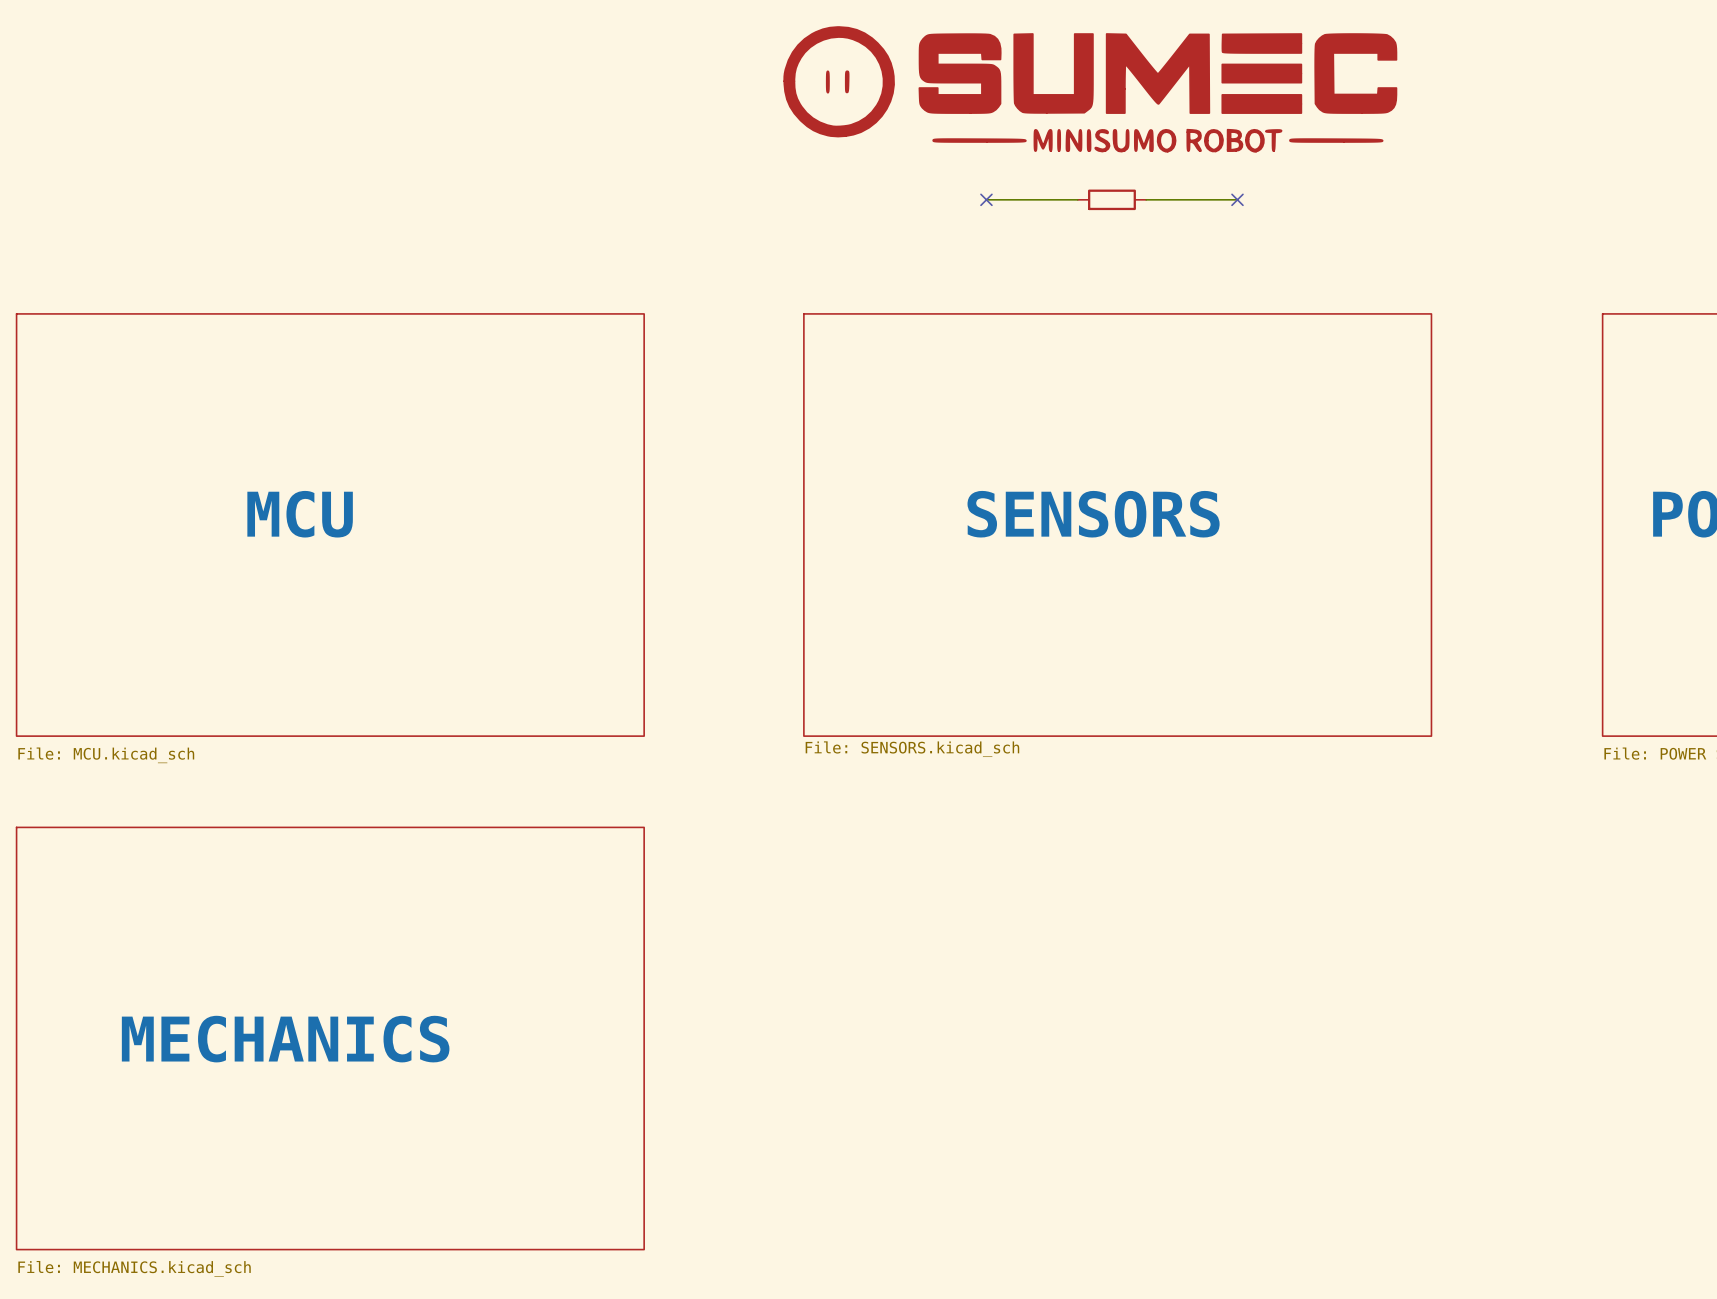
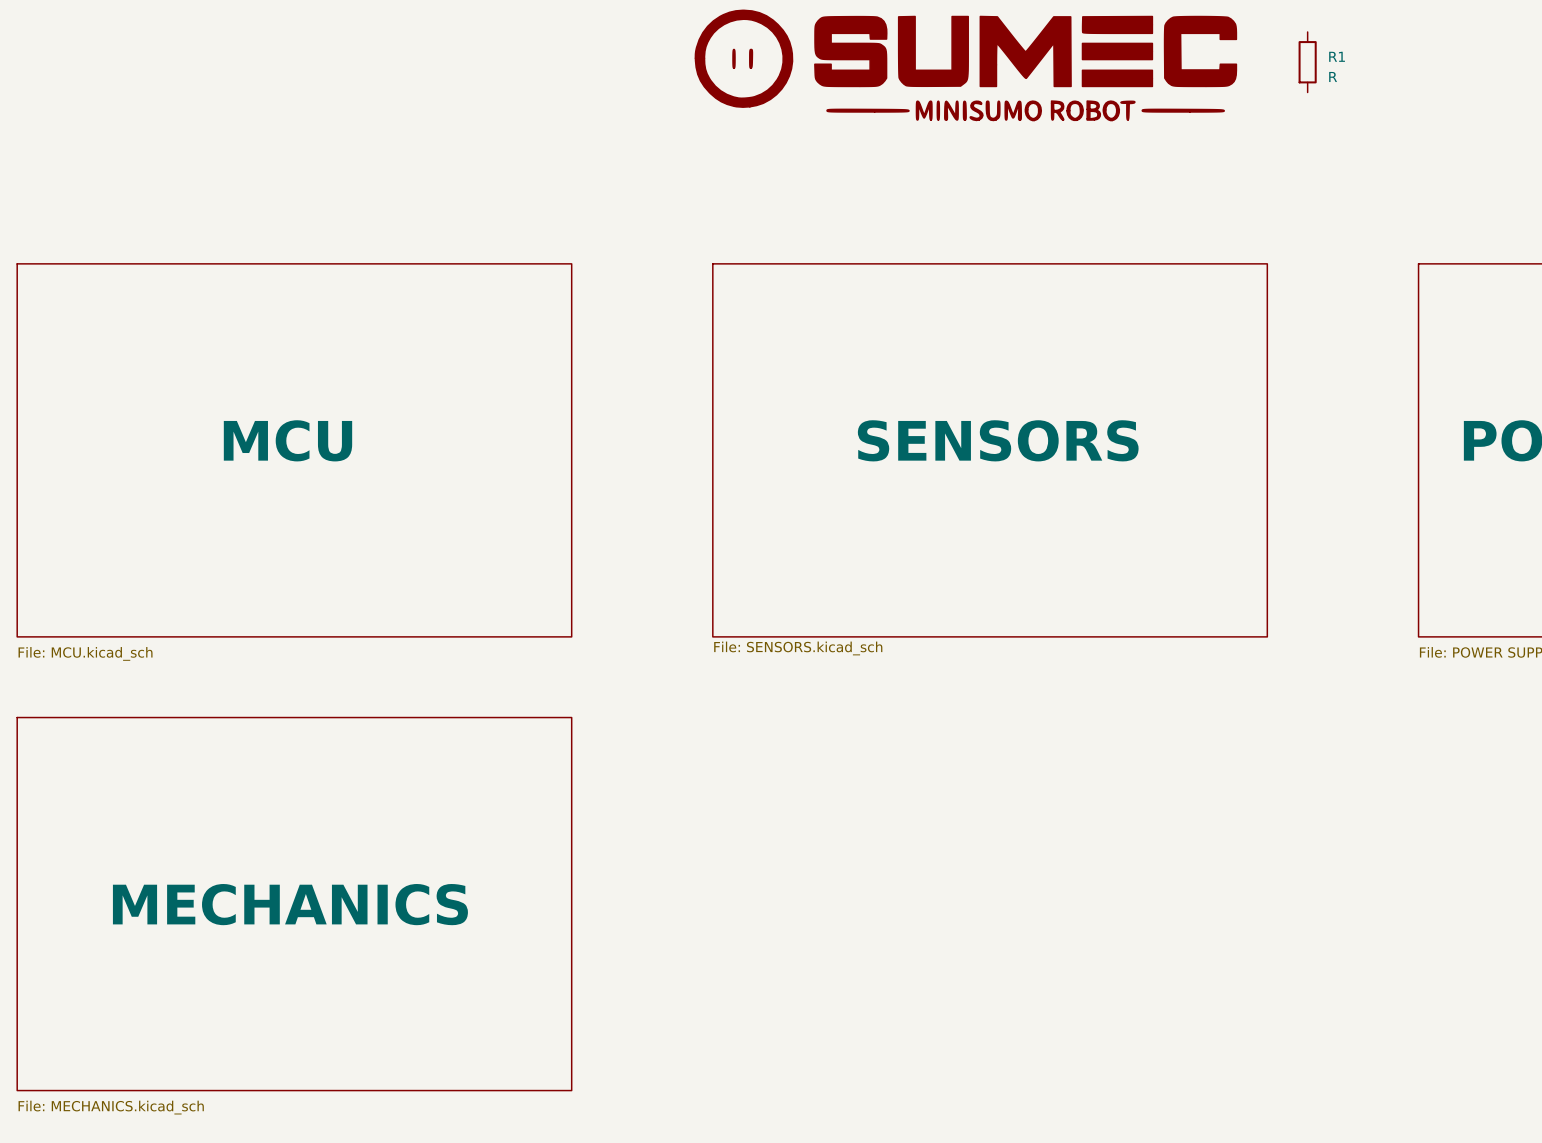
R1: none -> R (1307, 62)
wire: (986, 199) (1077, 199) -> none
no-connect mark: (986, 199) -> none
part: (1111, 199) -> none
wire: (1146, 199) (1237, 199) -> none
no-connect mark: (1237, 199) -> none

